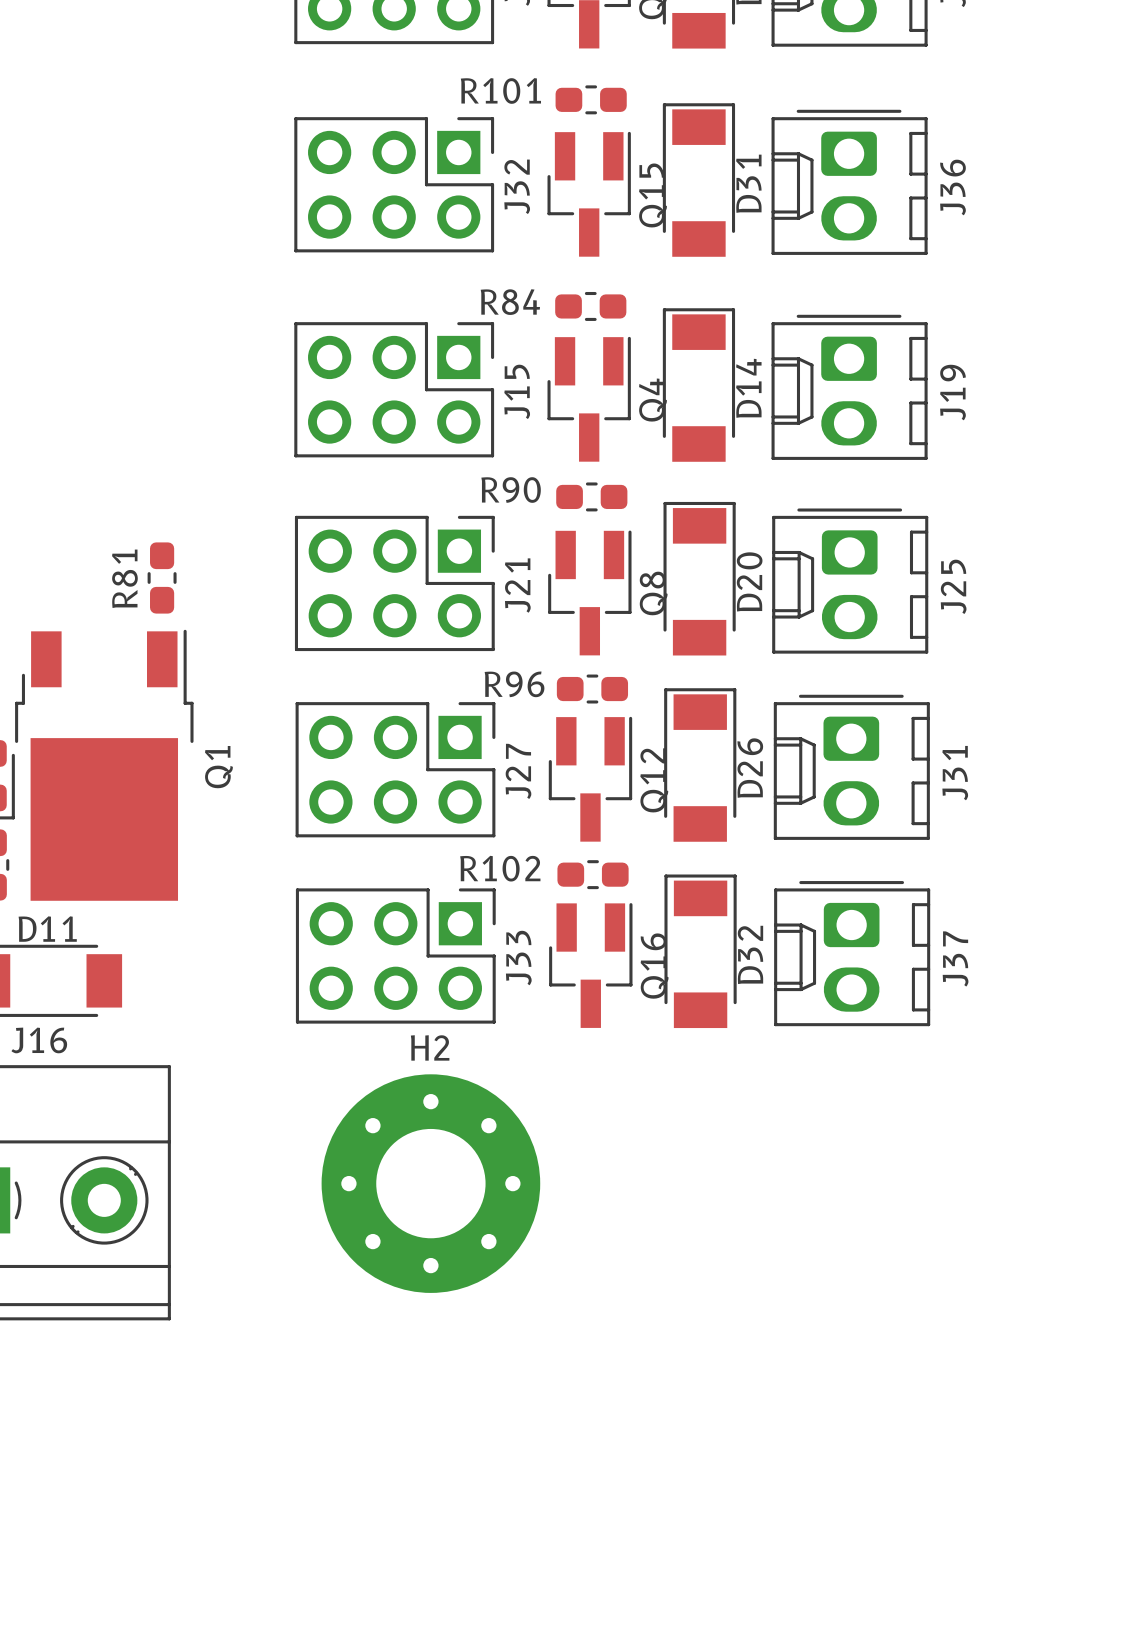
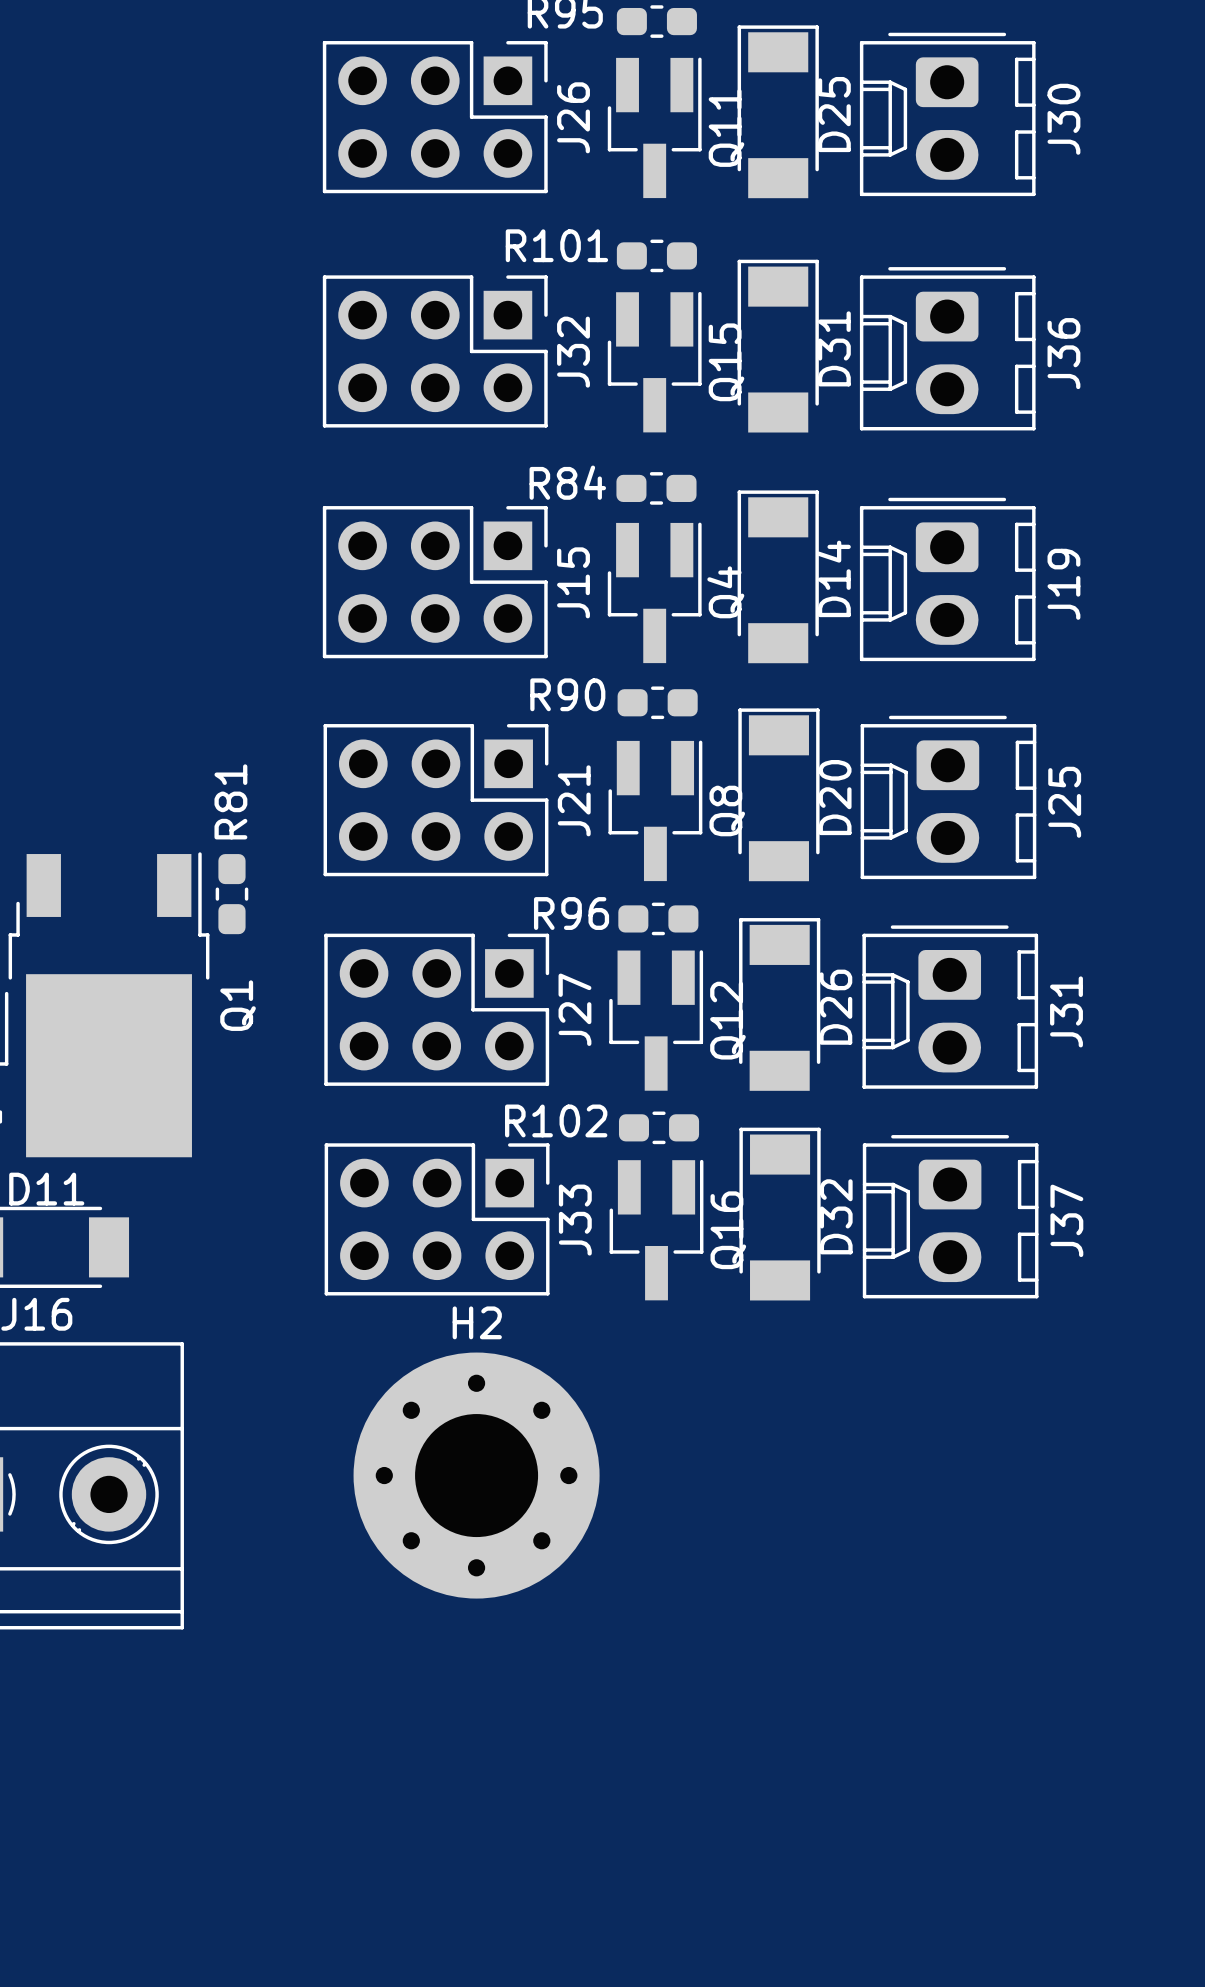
R81 name position: R81 (124, 578) -> R81 (230, 801)
R81 position: (162, 578) -> (231, 894)

